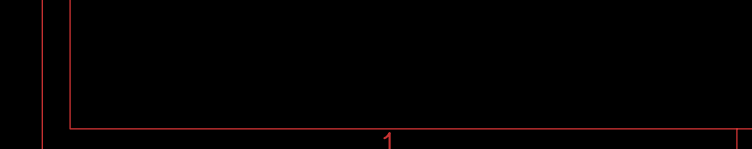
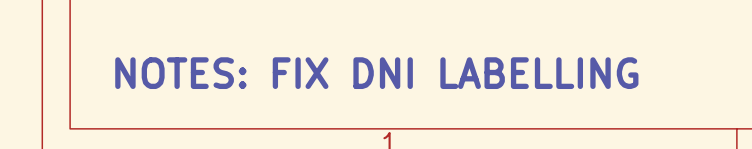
text: none -> NOTES: FIX DNI LABELLING (376, 73)

